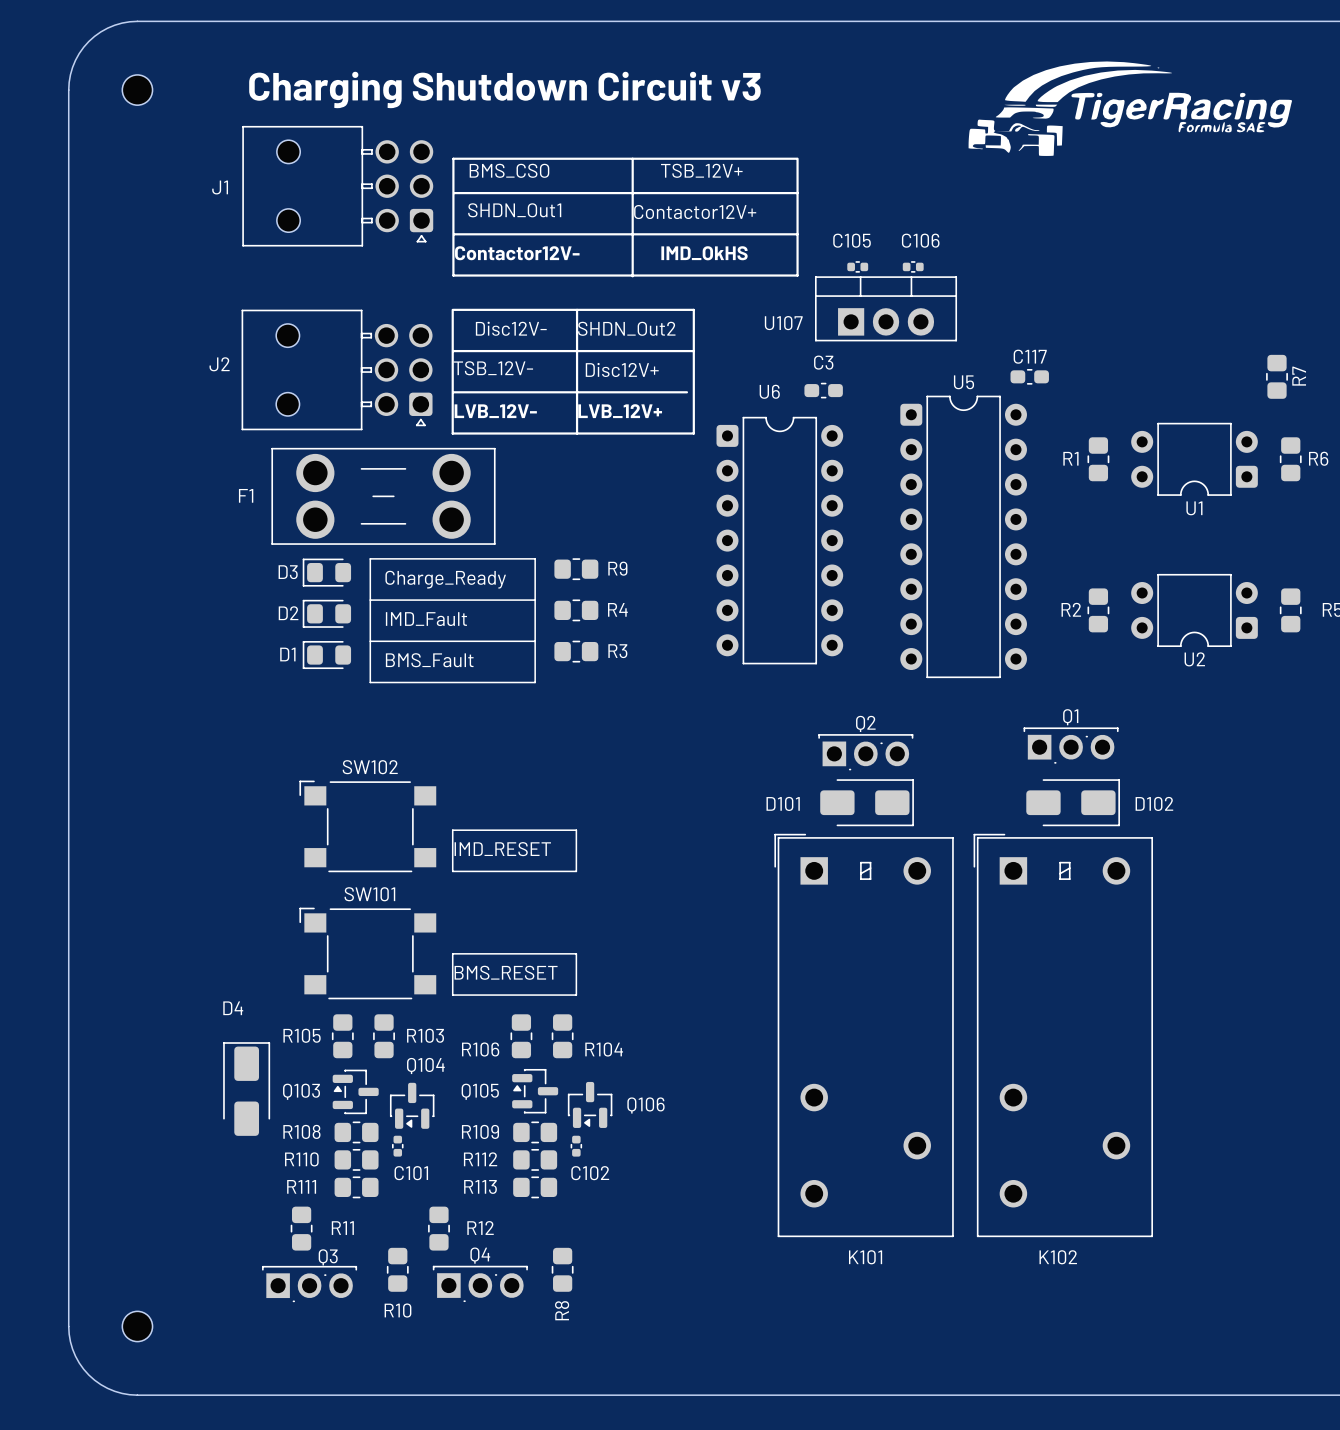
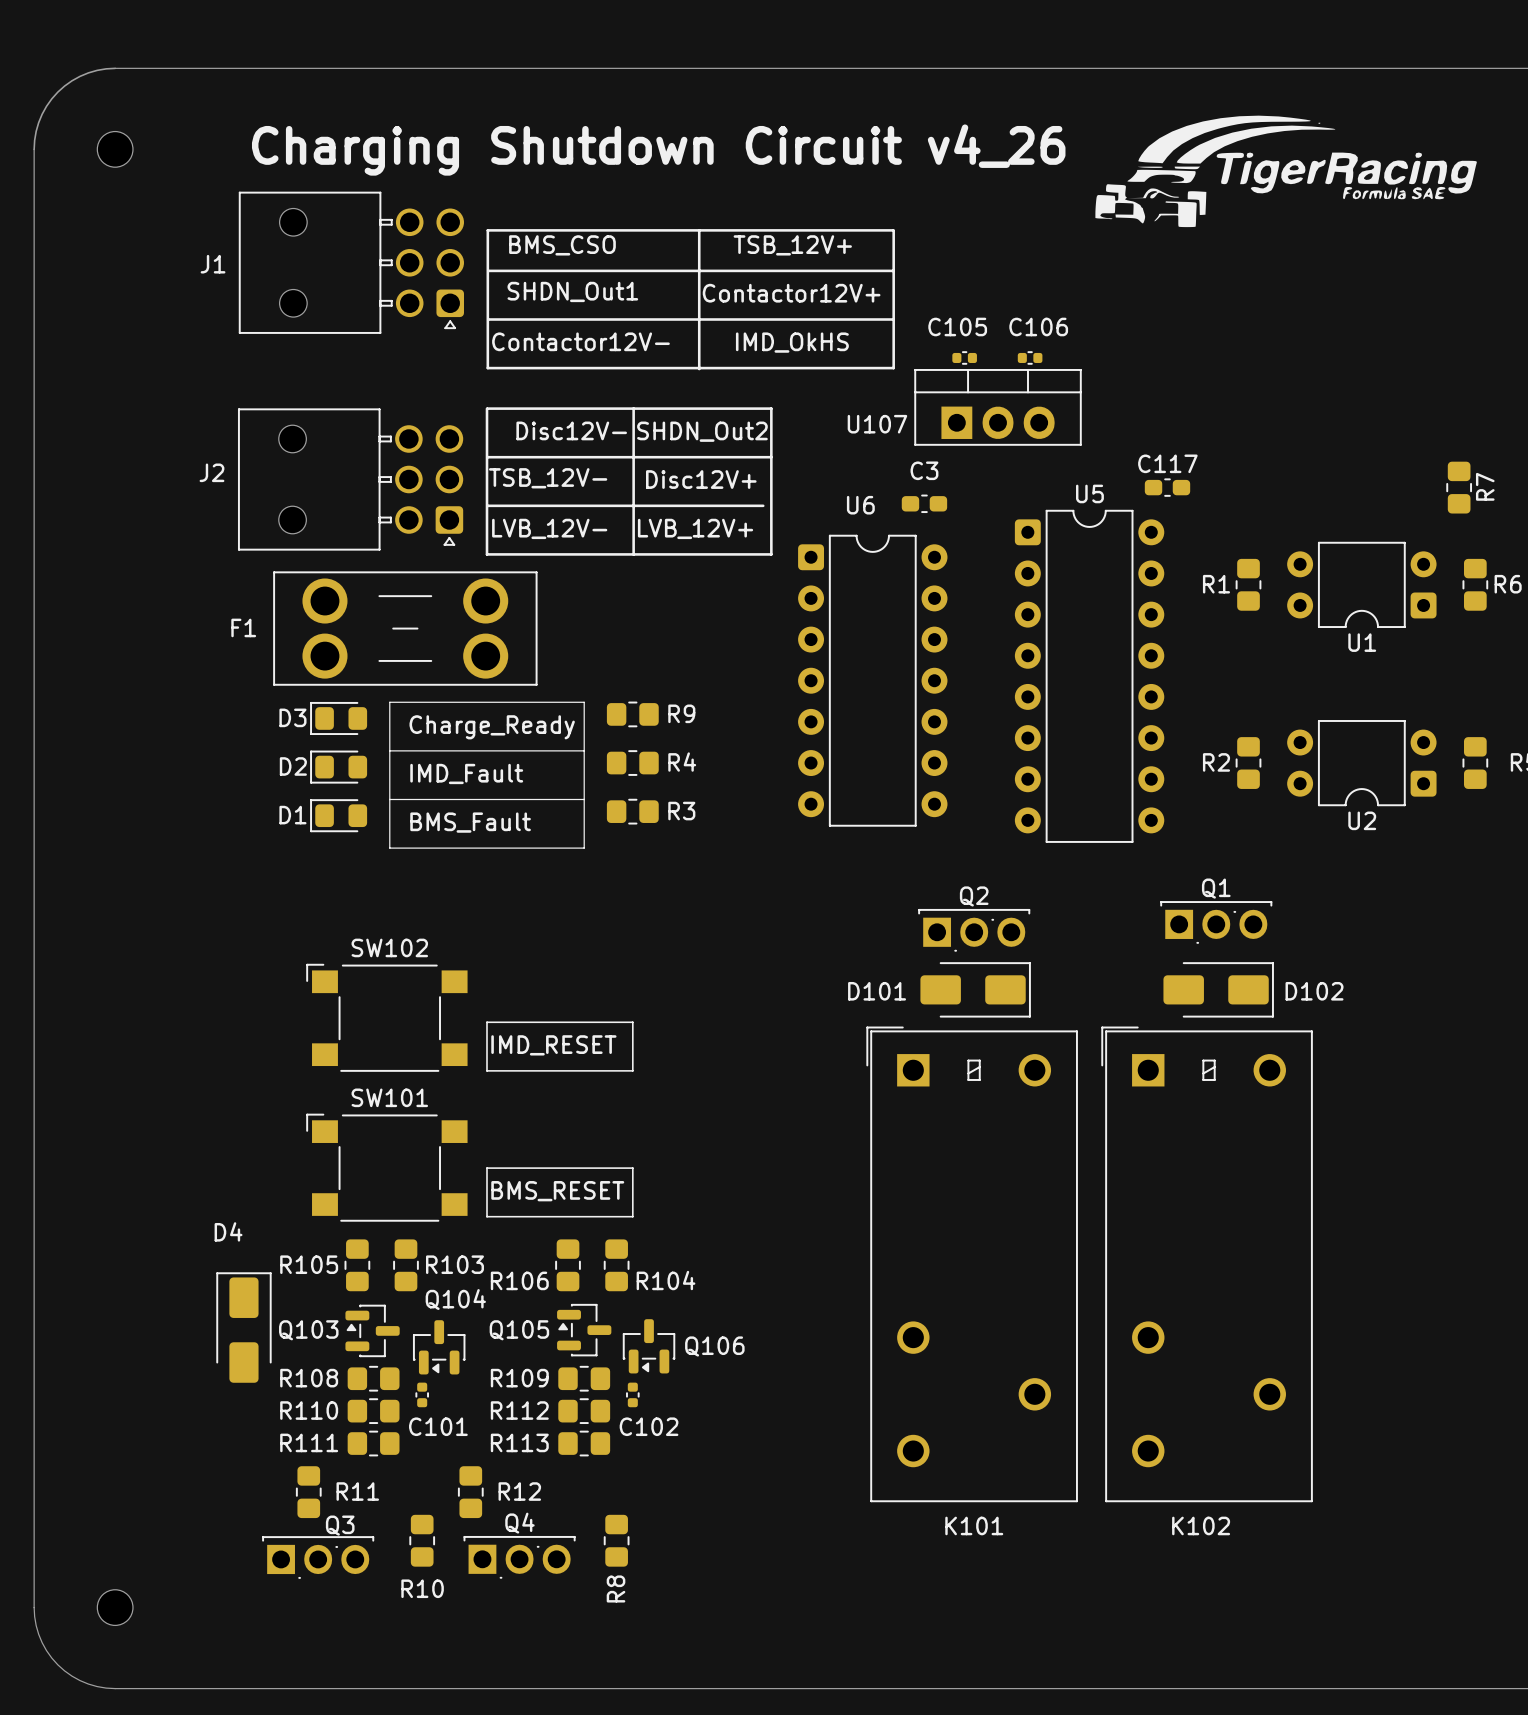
text: Charging Shutdown Circuit v3 (504, 89) -> Charging Shutdown Circuit v4_26 (658, 150)

